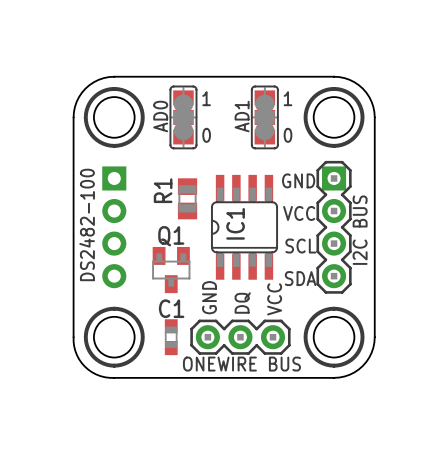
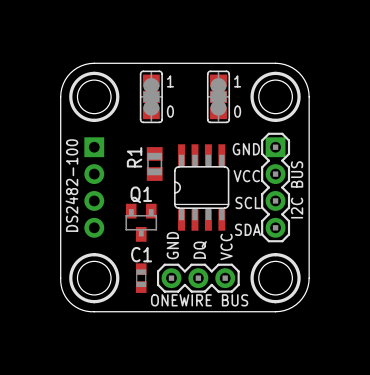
text: AD0 (160, 116) -> none
text: AD1 (242, 116) -> none
IC1 name: IC1 (235, 223) -> none

